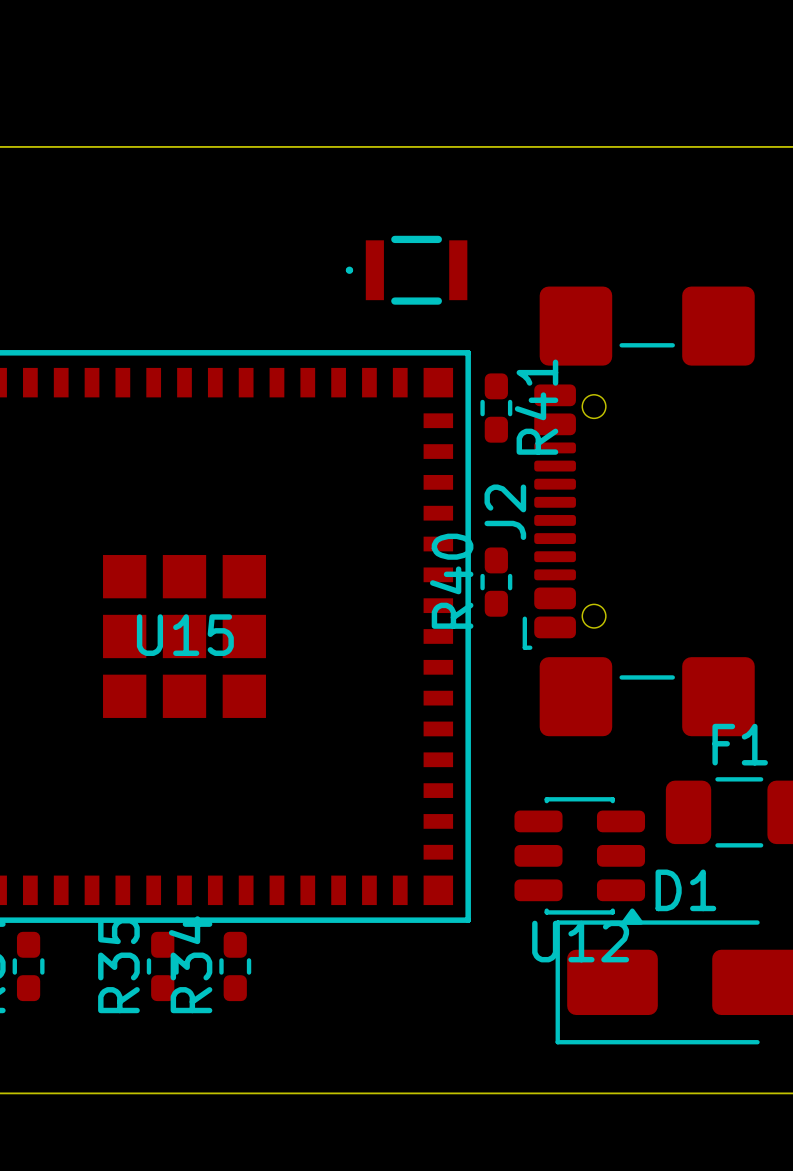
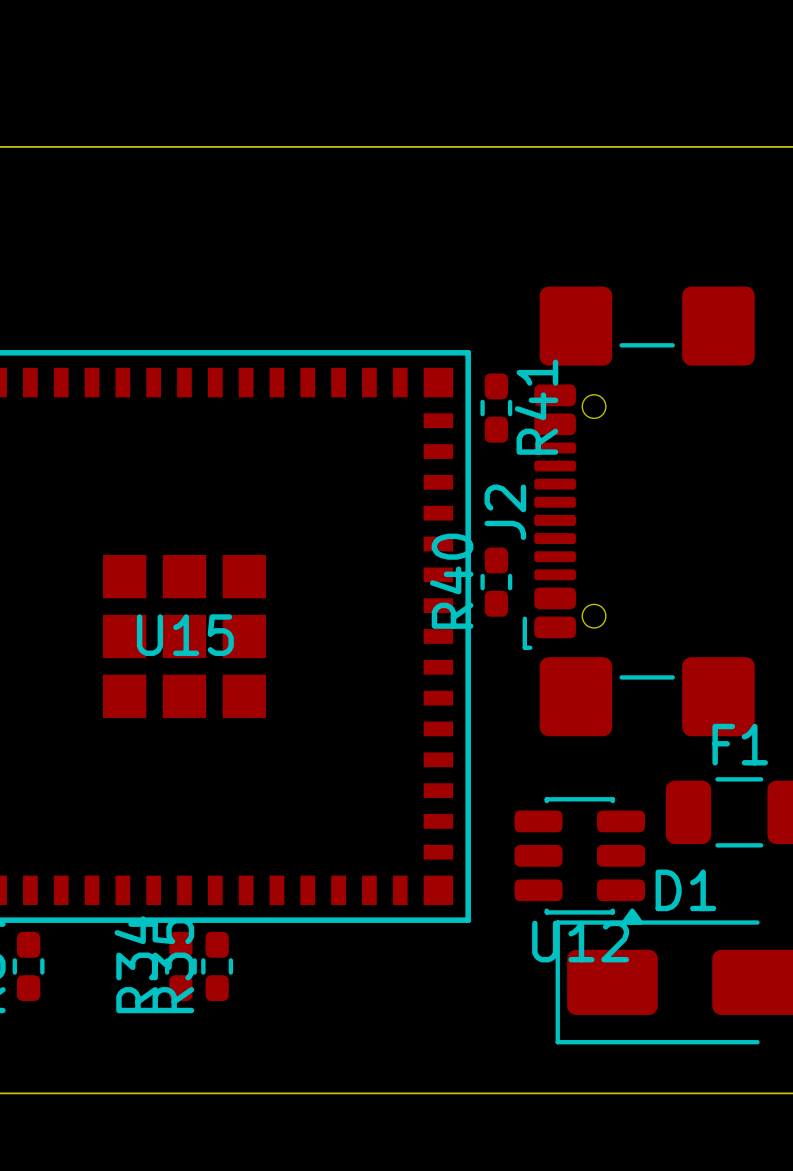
part: (406, 270) -> none
R35 position: (162, 966) -> (217, 966)
R34 position: (235, 966) -> (180, 966)

